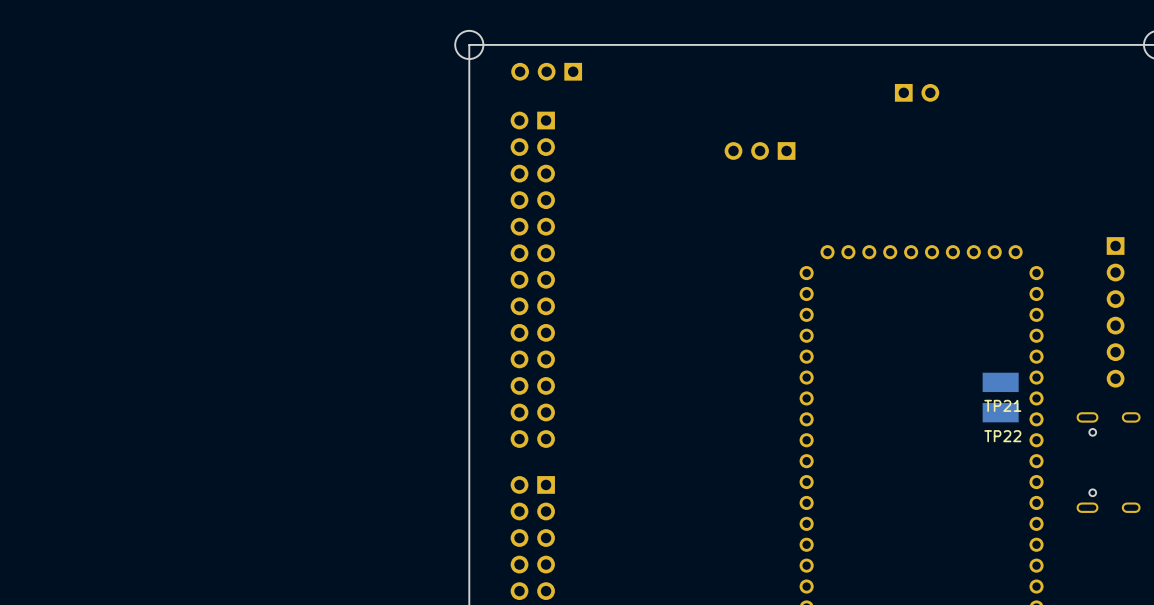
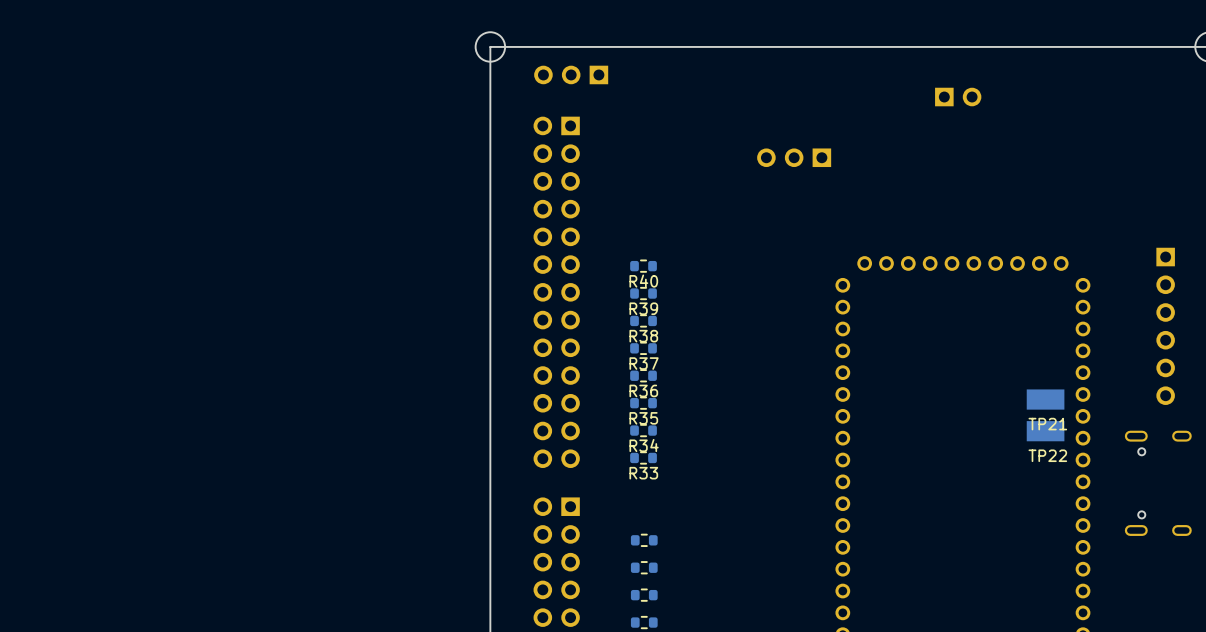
R40: none -> (643, 266)
R39: none -> (643, 293)
R38: none -> (643, 320)
R37: none -> (643, 348)
R36: none -> (643, 375)
R35: none -> (643, 403)
R34: none -> (643, 430)
R33: none -> (643, 457)
part: none -> (644, 540)
part: none -> (644, 567)
part: none -> (644, 595)
part: none -> (644, 622)

